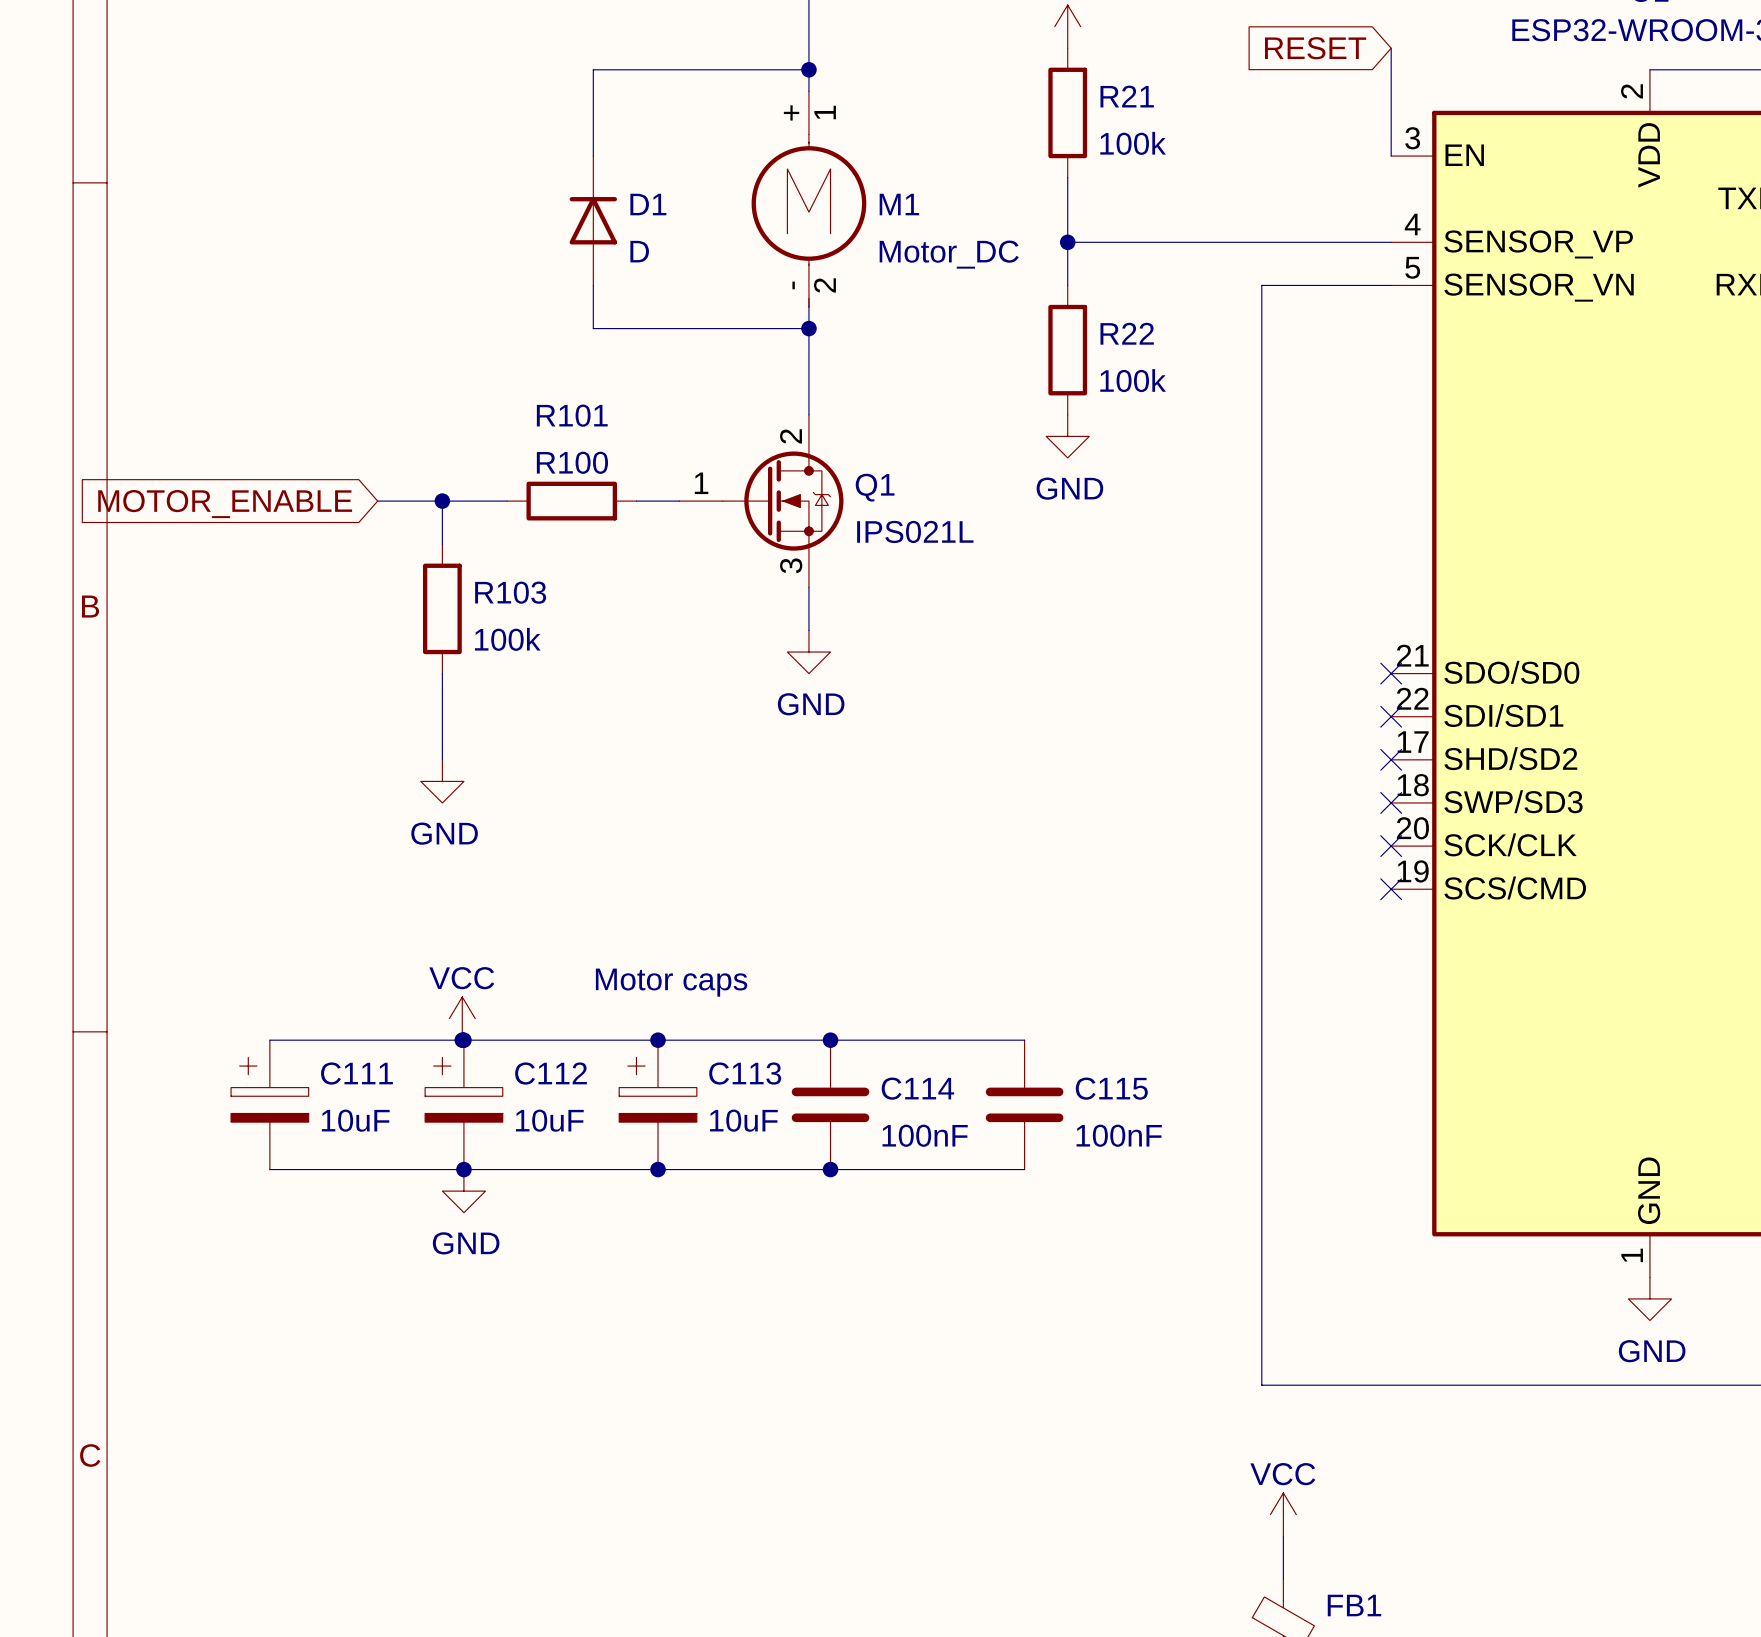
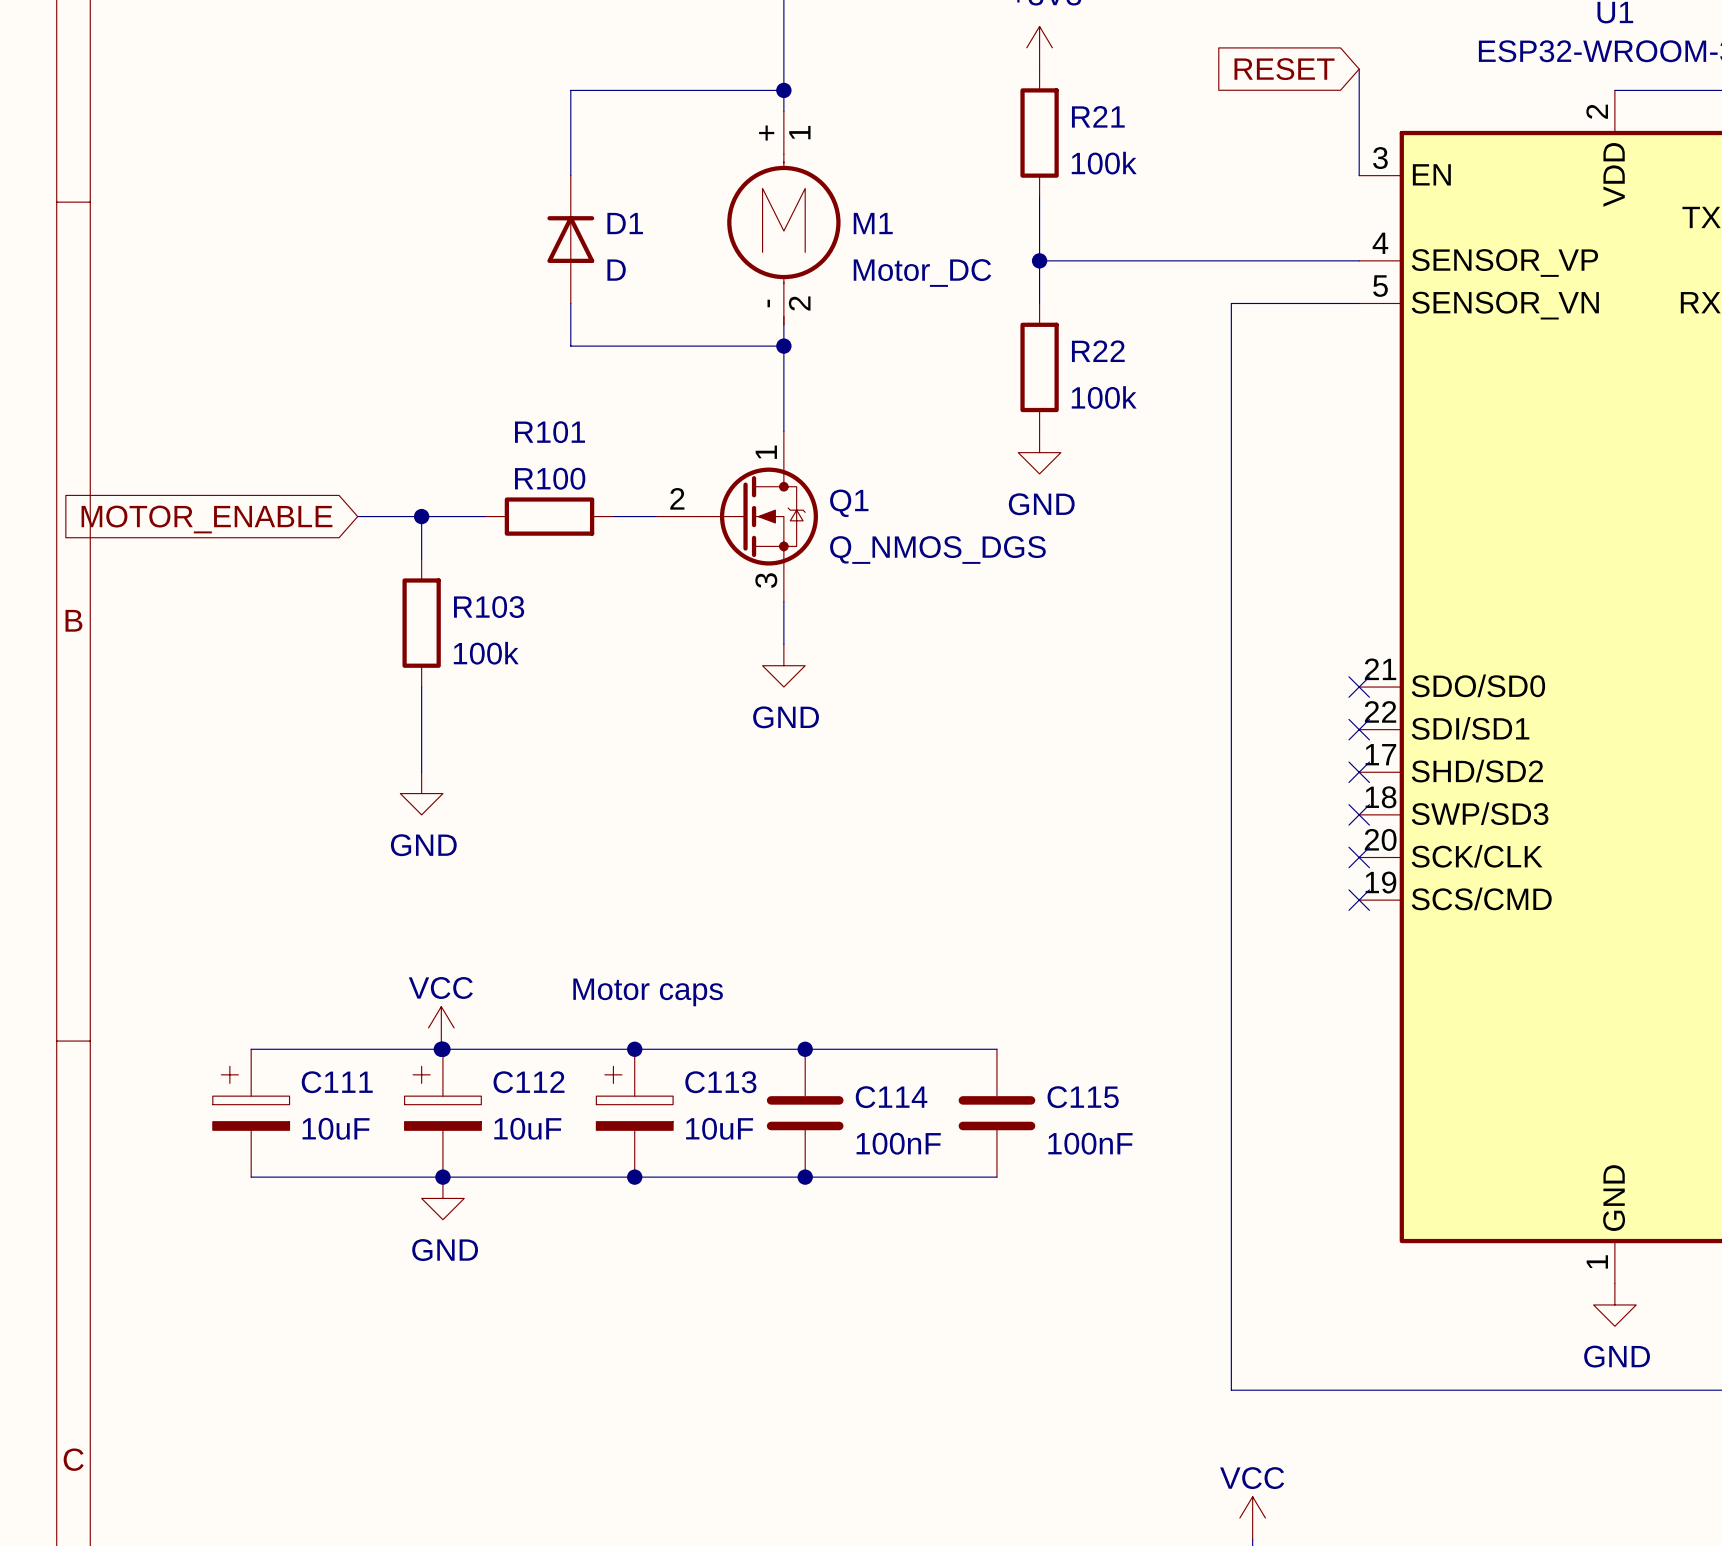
Q1 pin number: 2 (791, 436) -> 1 (766, 452)
Q1 pin number: 1 (701, 483) -> 2 (677, 498)
Q1 value: IPS021L (915, 531) -> Q_NMOS_DGS (937, 550)

